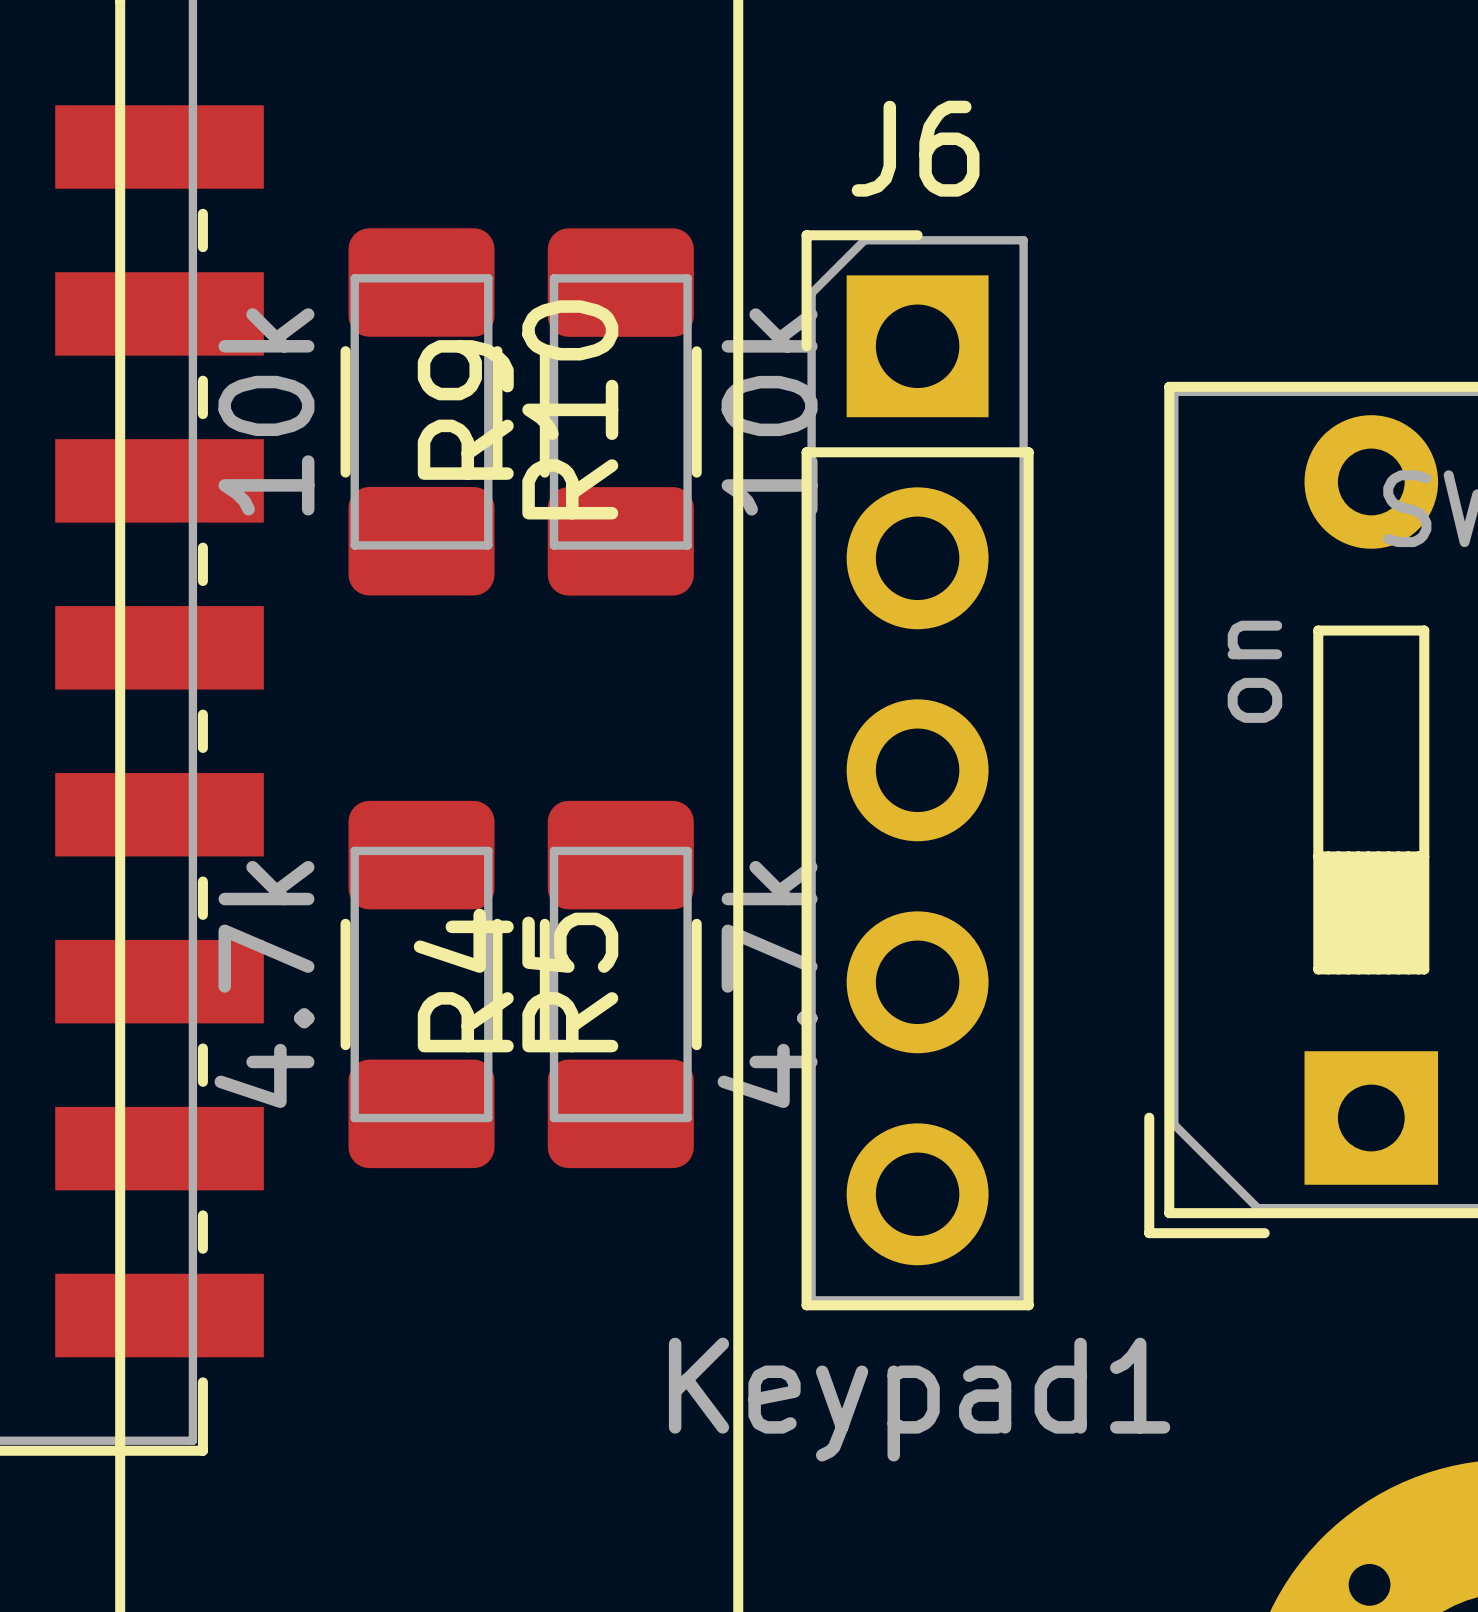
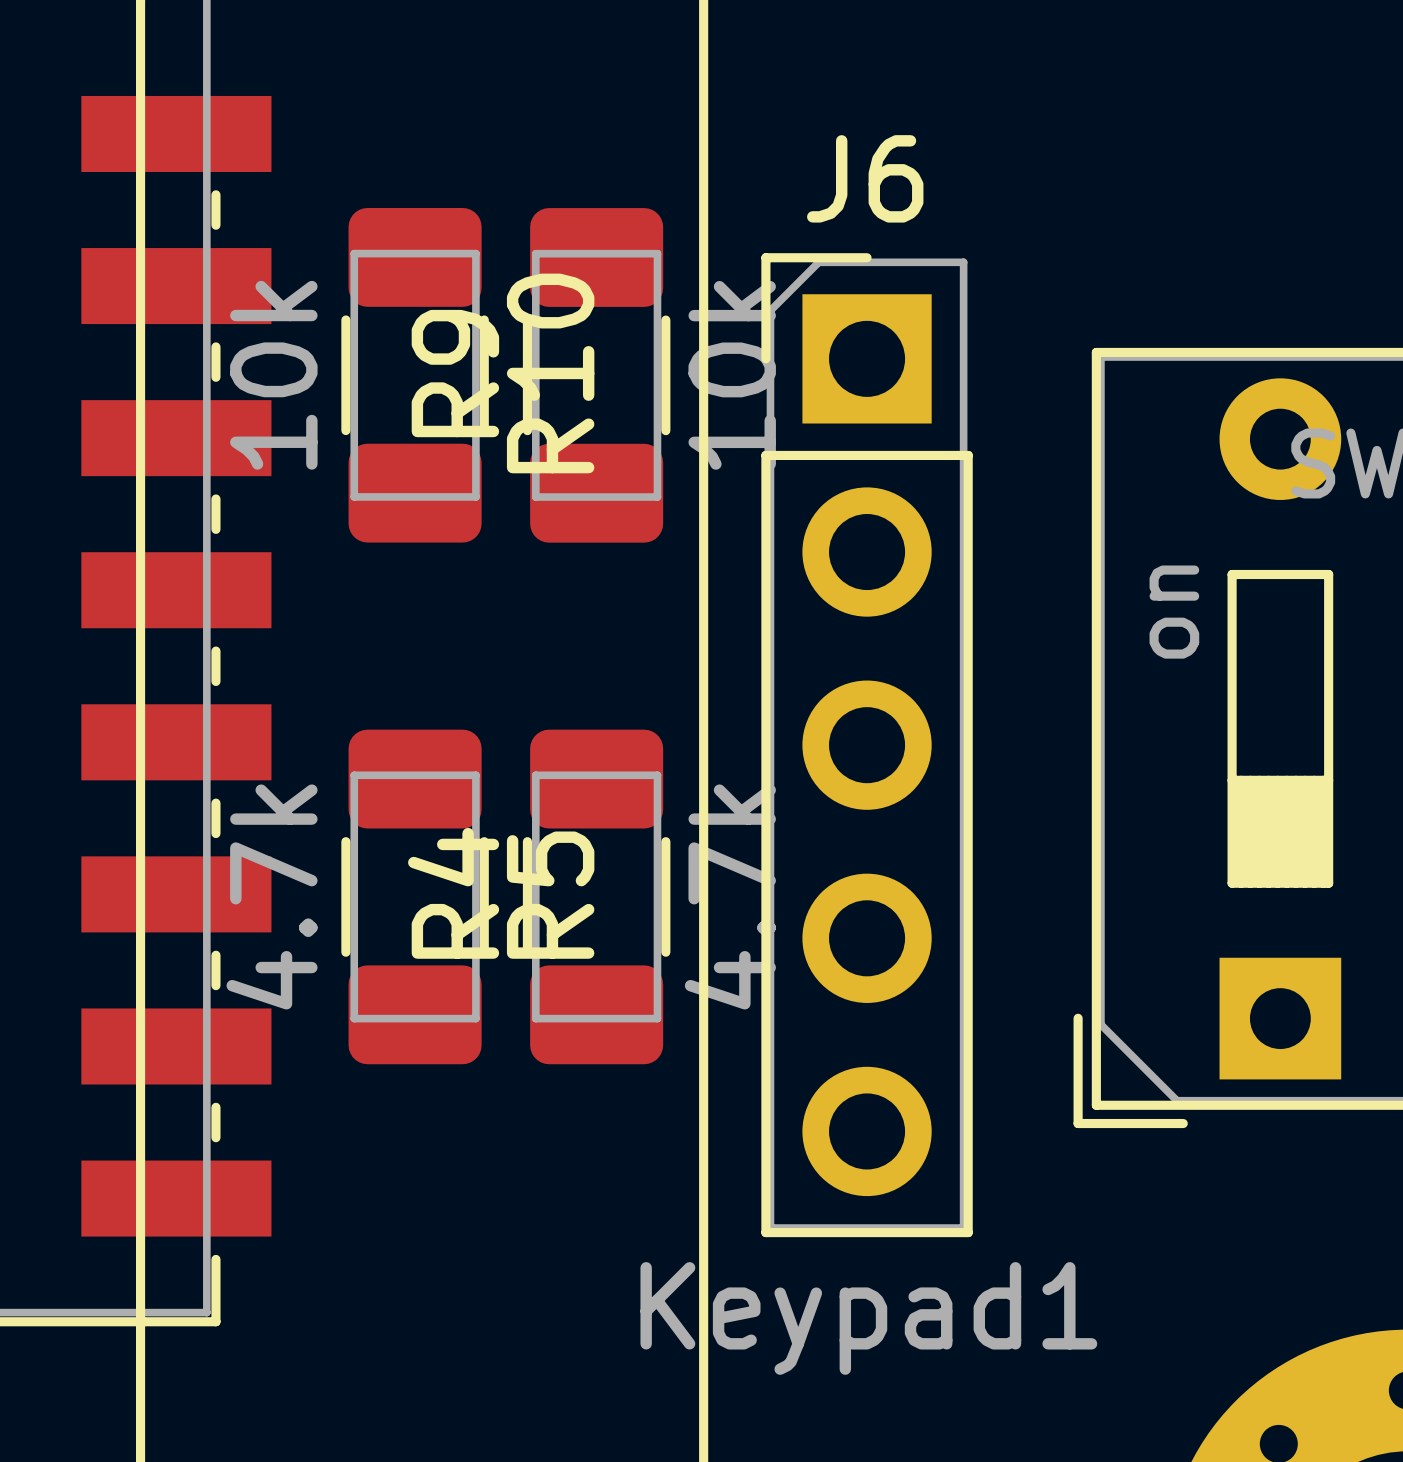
J6 position: (917, 770) -> (867, 745)

